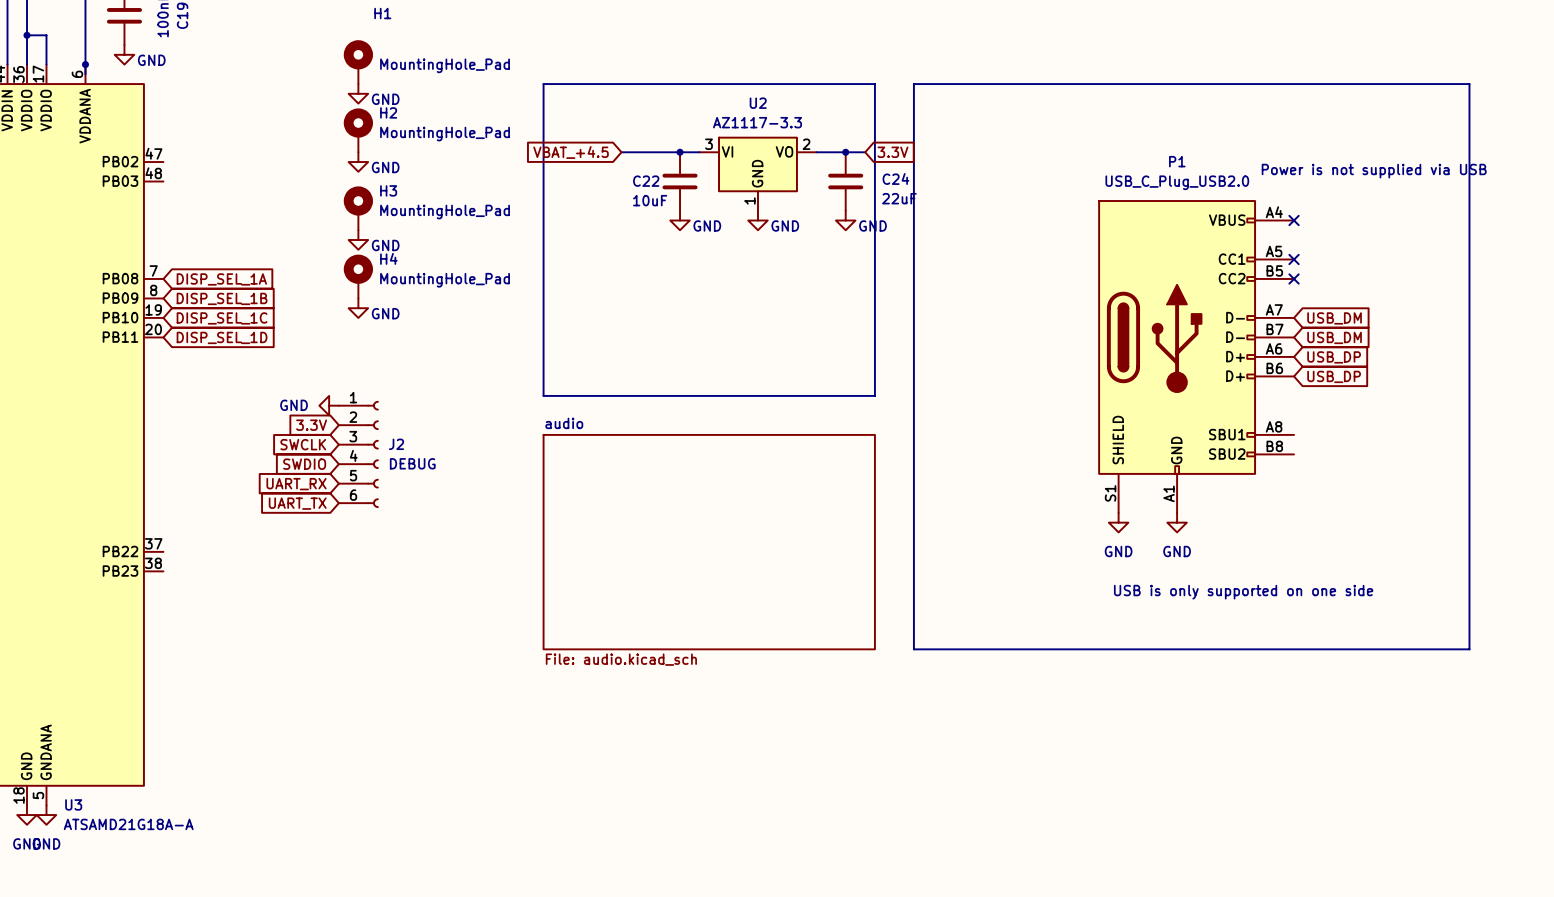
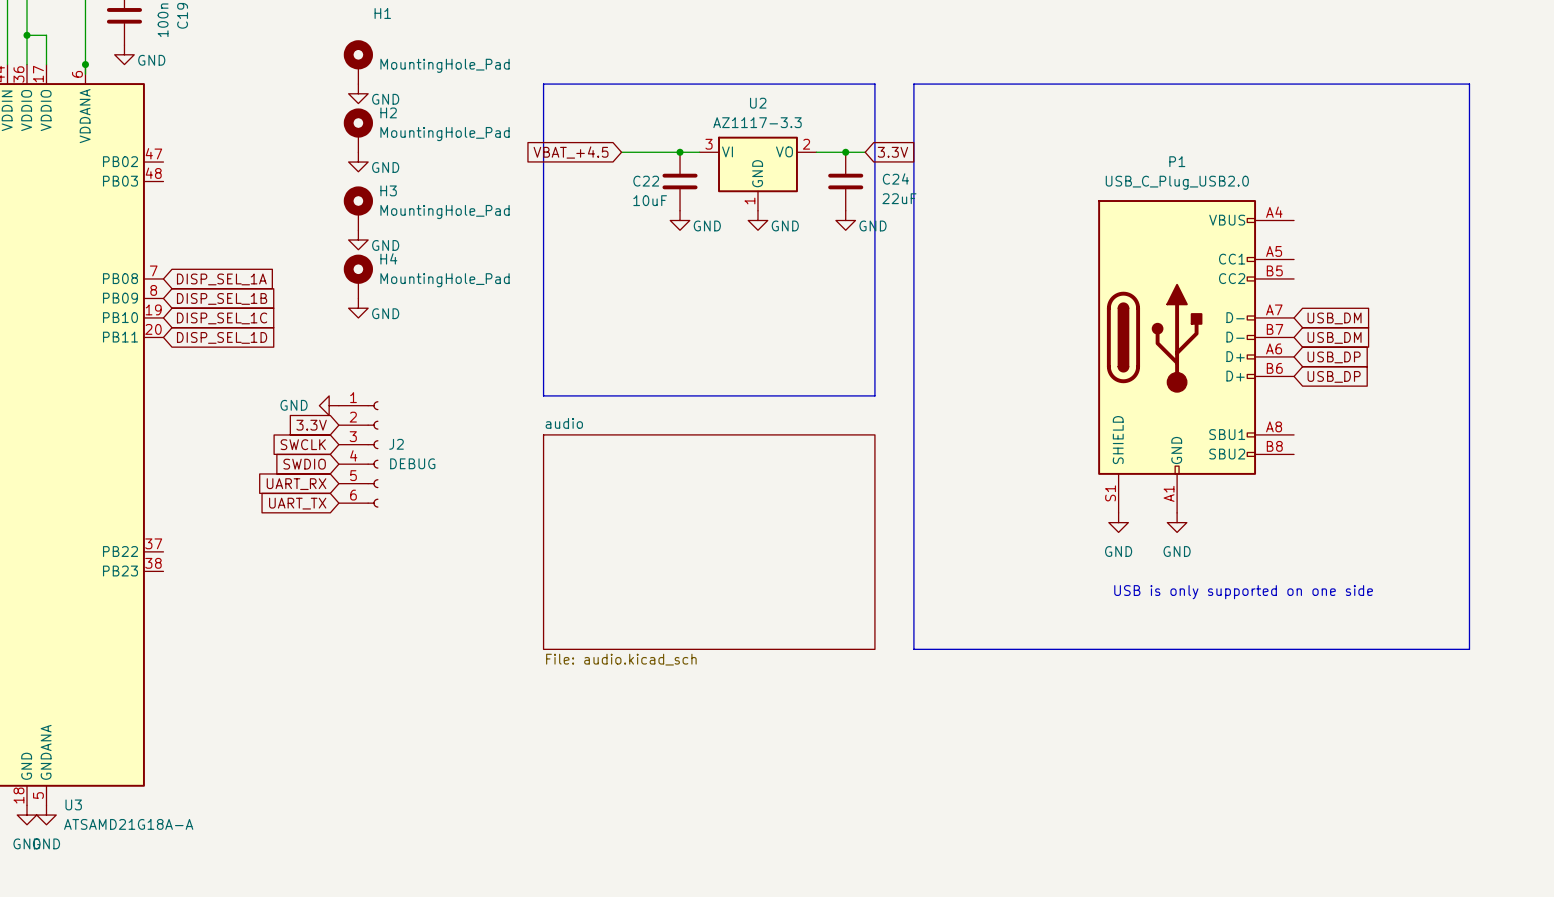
text: Power is not supplied via USB (1374, 171) -> none
no-connect mark: (1294, 220) -> none
no-connect mark: (1294, 259) -> none
no-connect mark: (1294, 278) -> none

